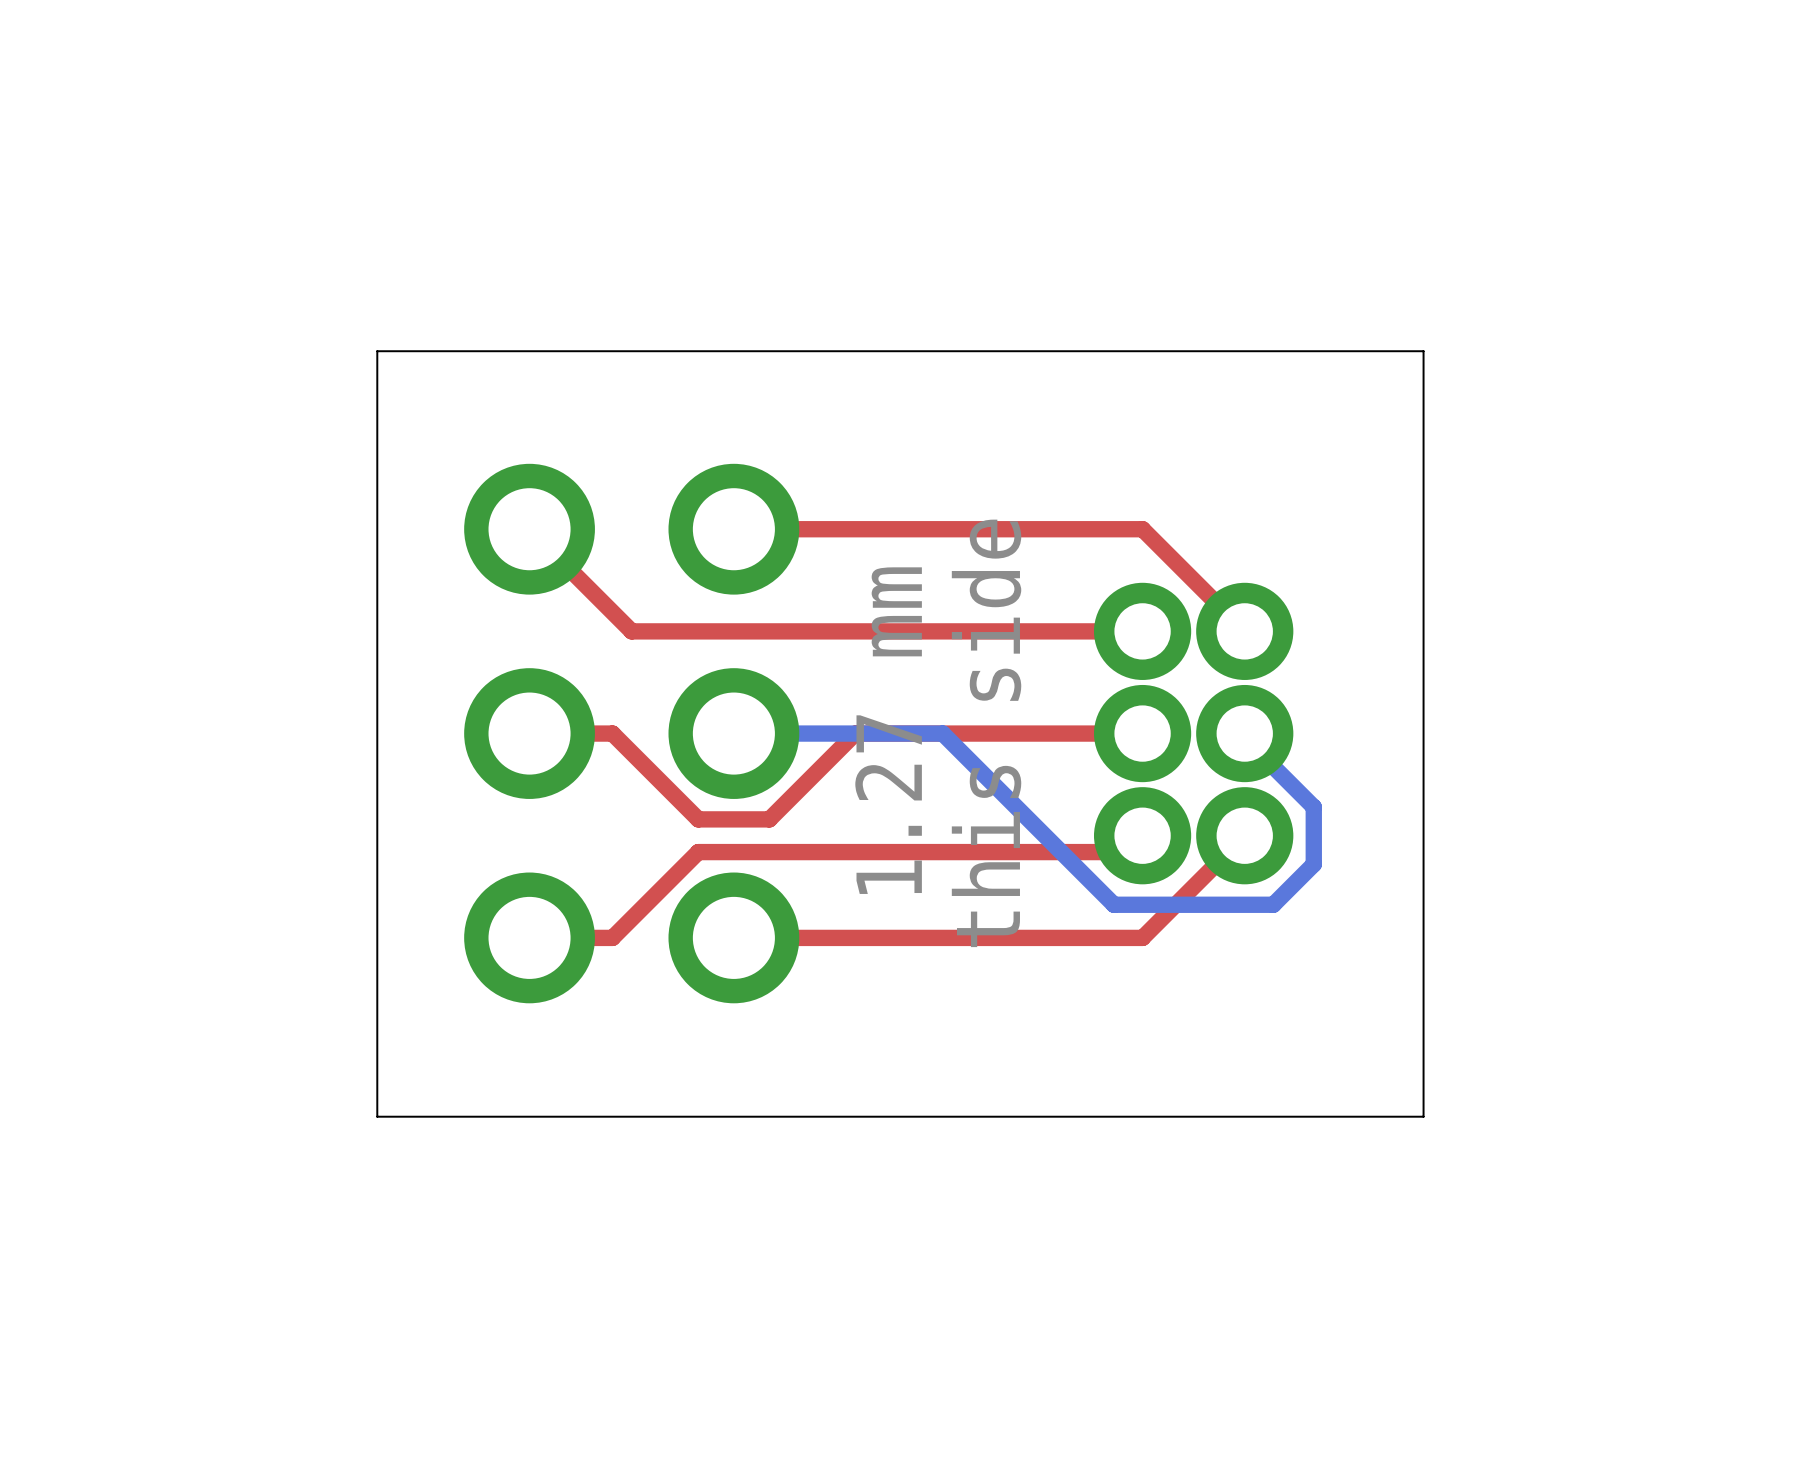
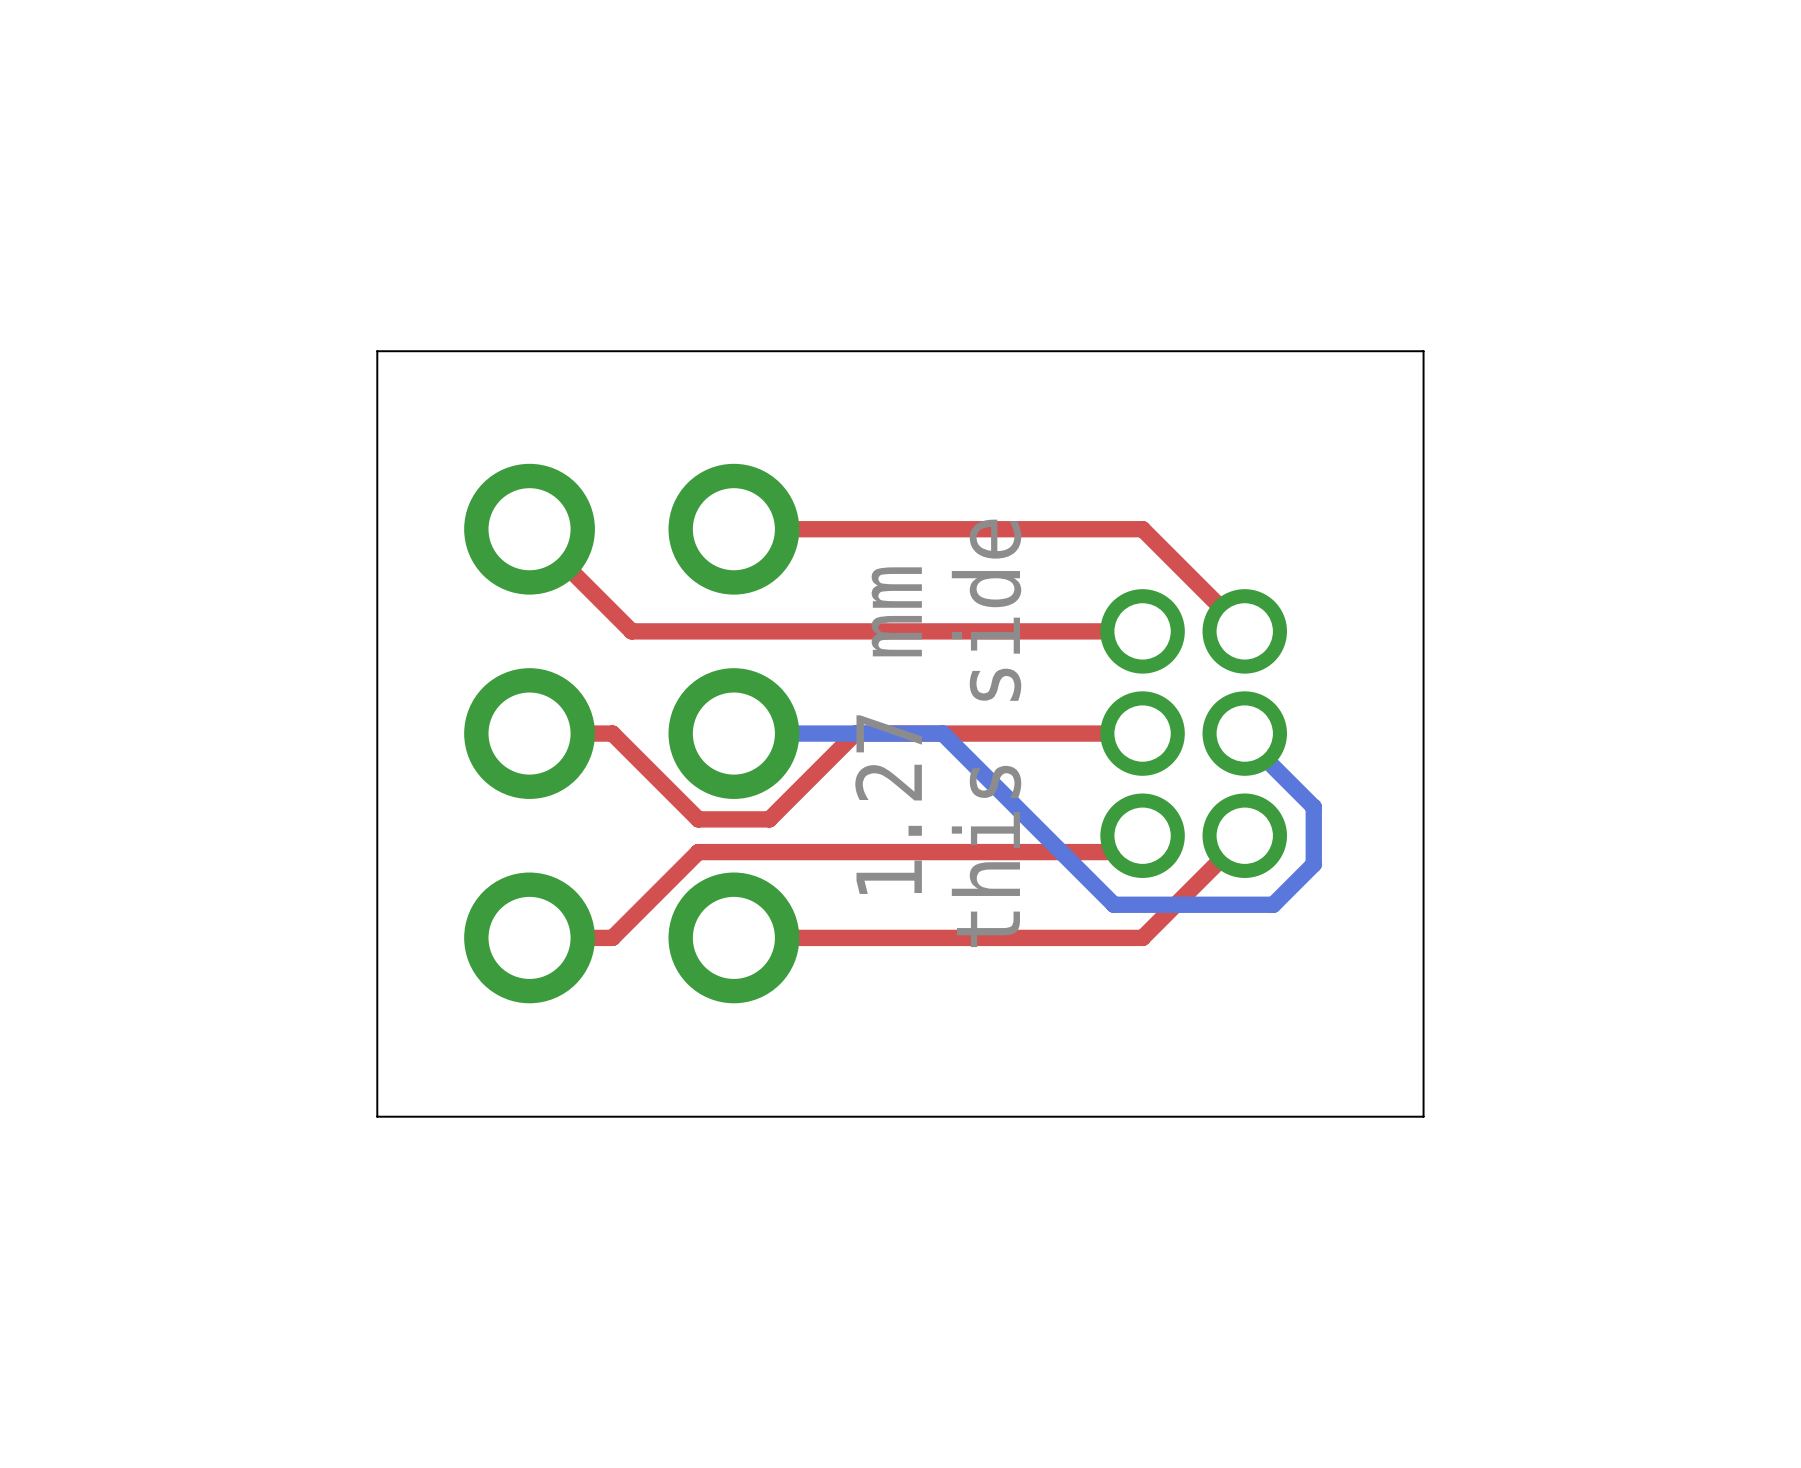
part footprint: [1093, 582, 1294, 885] -> [1100, 589, 1287, 878]

